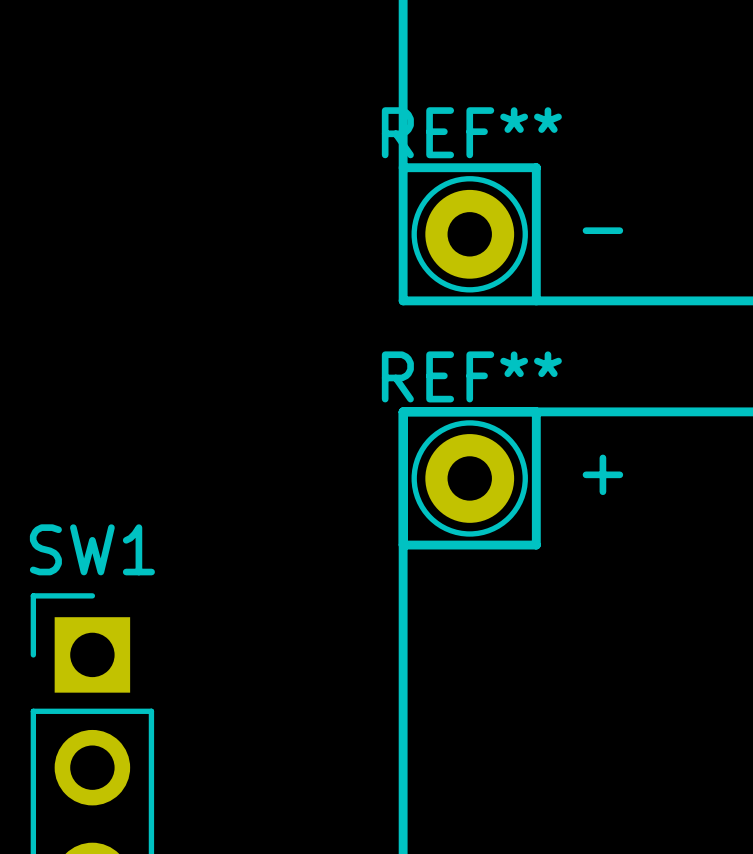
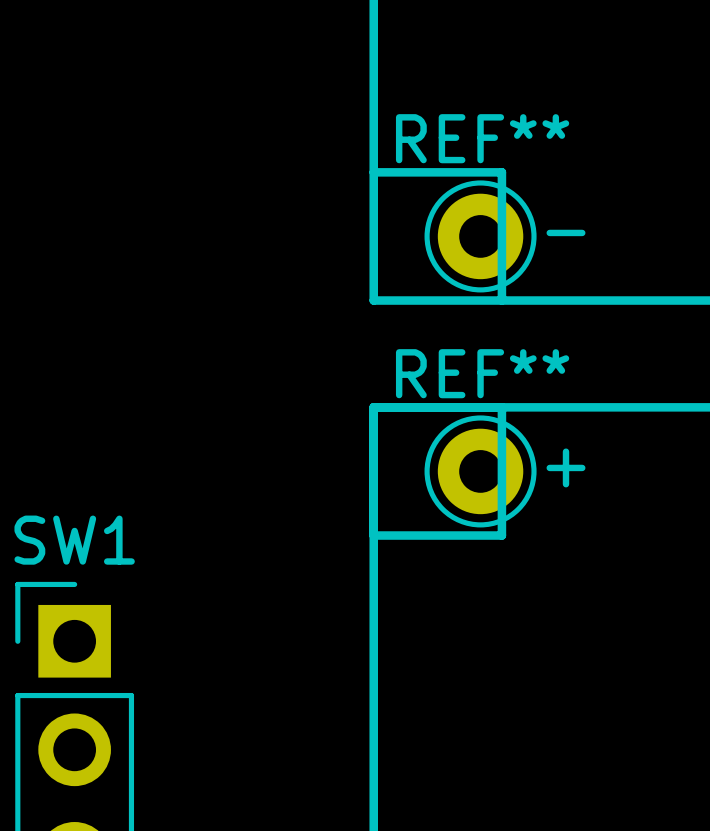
REF** position: (469, 234) -> (480, 236)
REF** position: (469, 478) -> (480, 471)

